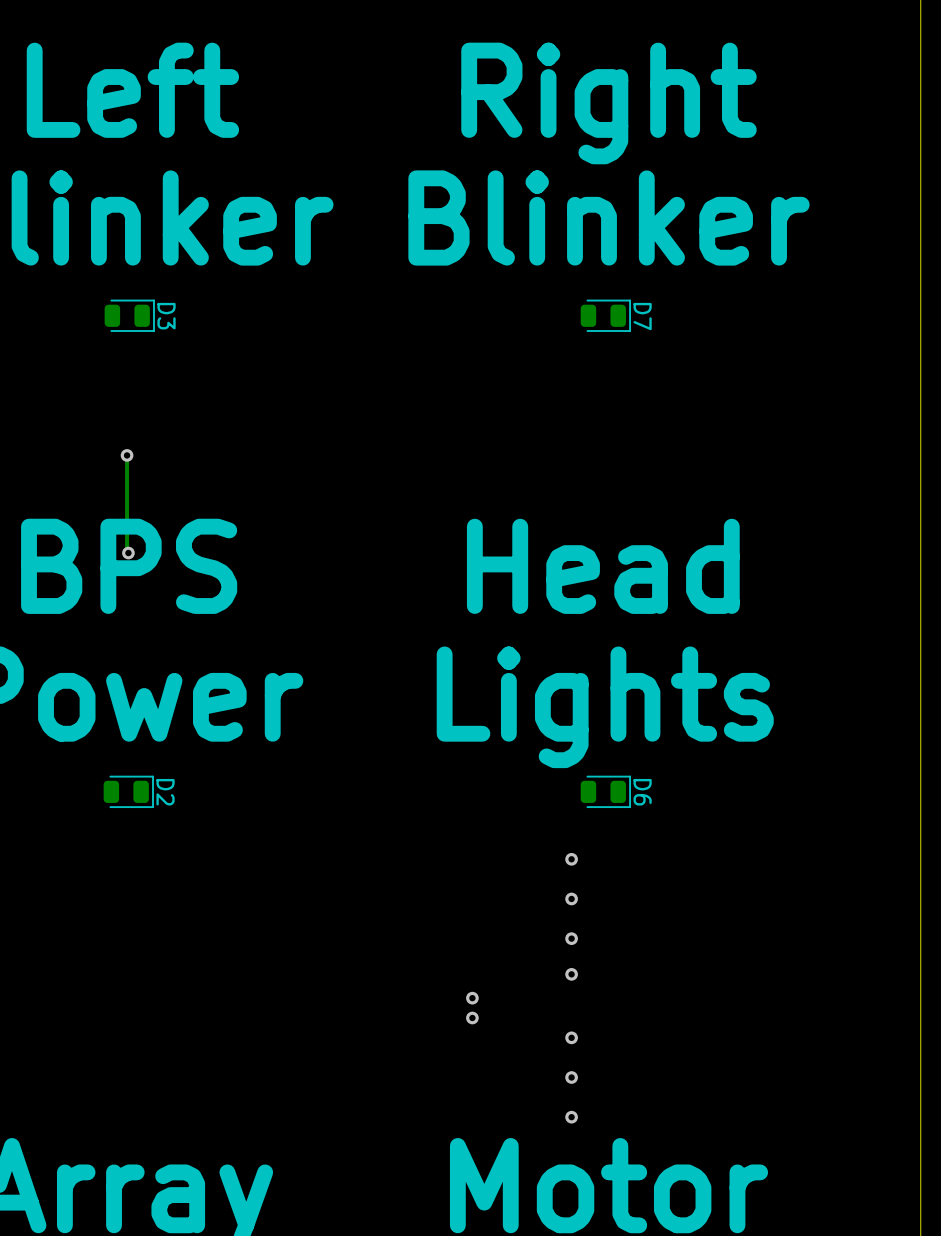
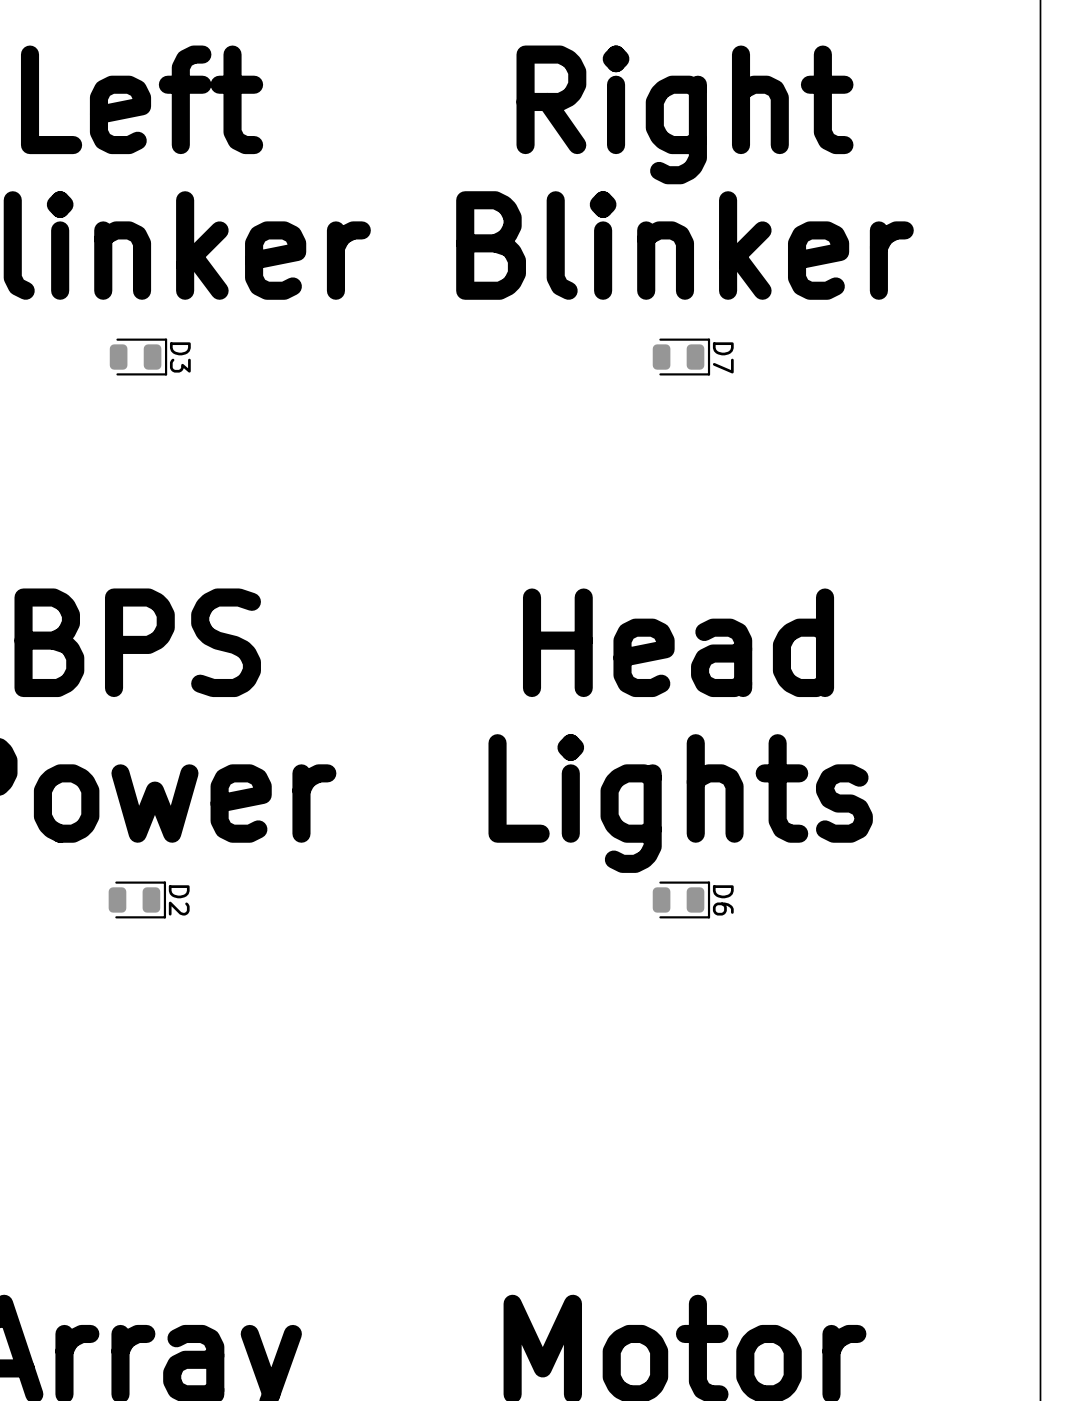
track: (127, 455) (128, 553) -> none
via: (127, 455) -> none
via: (128, 553) -> none
via: (571, 859) -> none
via: (571, 898) -> none
via: (571, 938) -> none
via: (571, 974) -> none
via: (472, 998) -> none
via: (472, 1017) -> none
via: (571, 1037) -> none
via: (571, 1077) -> none
via: (571, 1117) -> none

